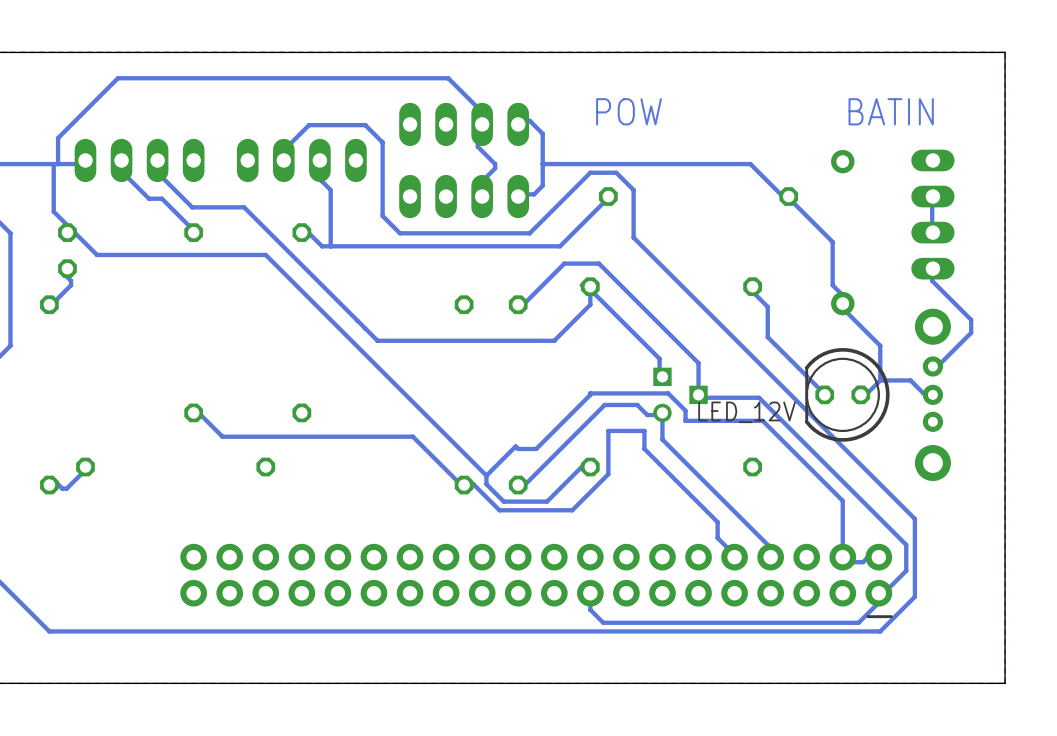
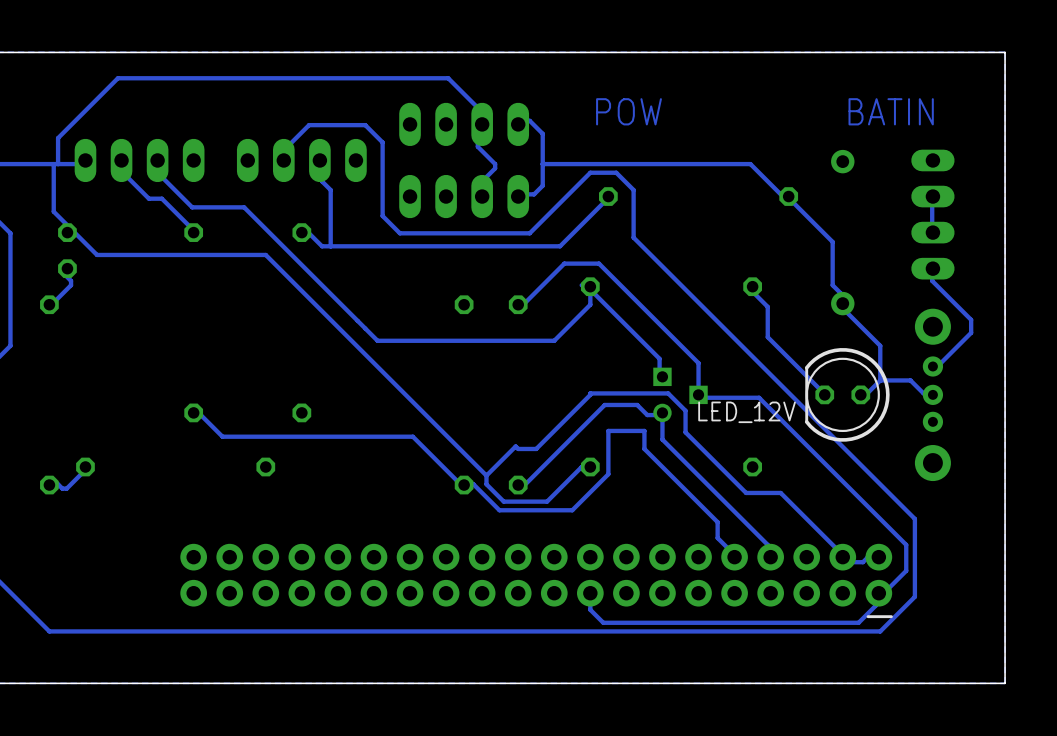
track: (685, 420) (762, 420) (842, 500) (842, 557) -> (685, 420) (685, 432) (746, 492) (780, 492) (842, 557)

